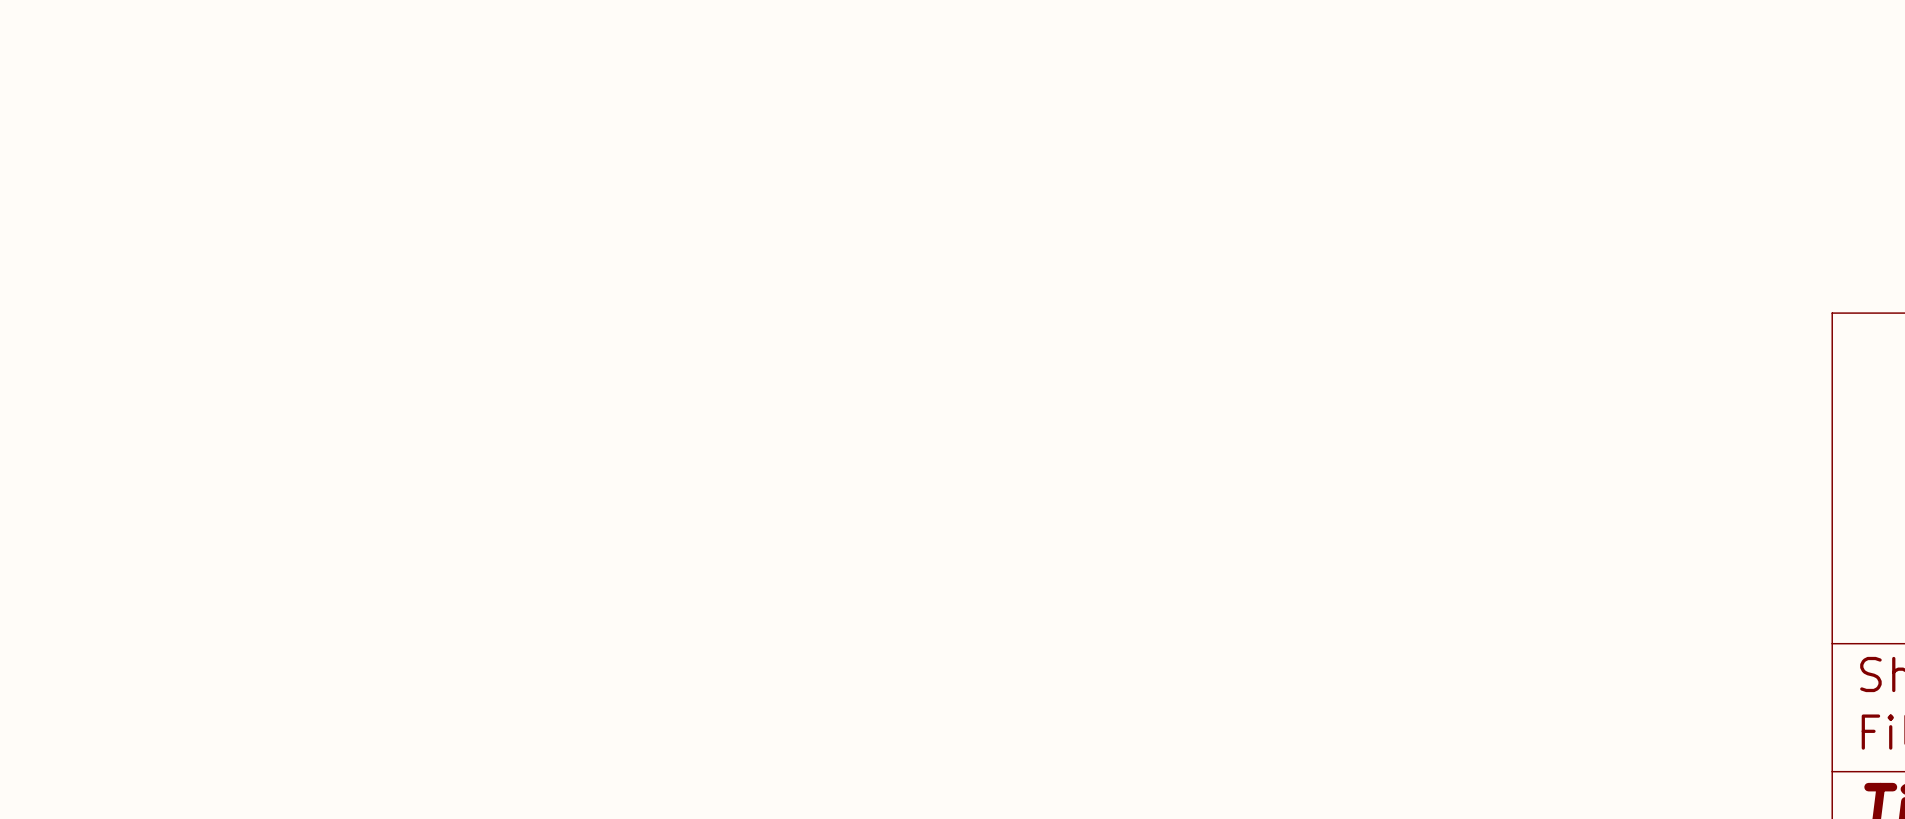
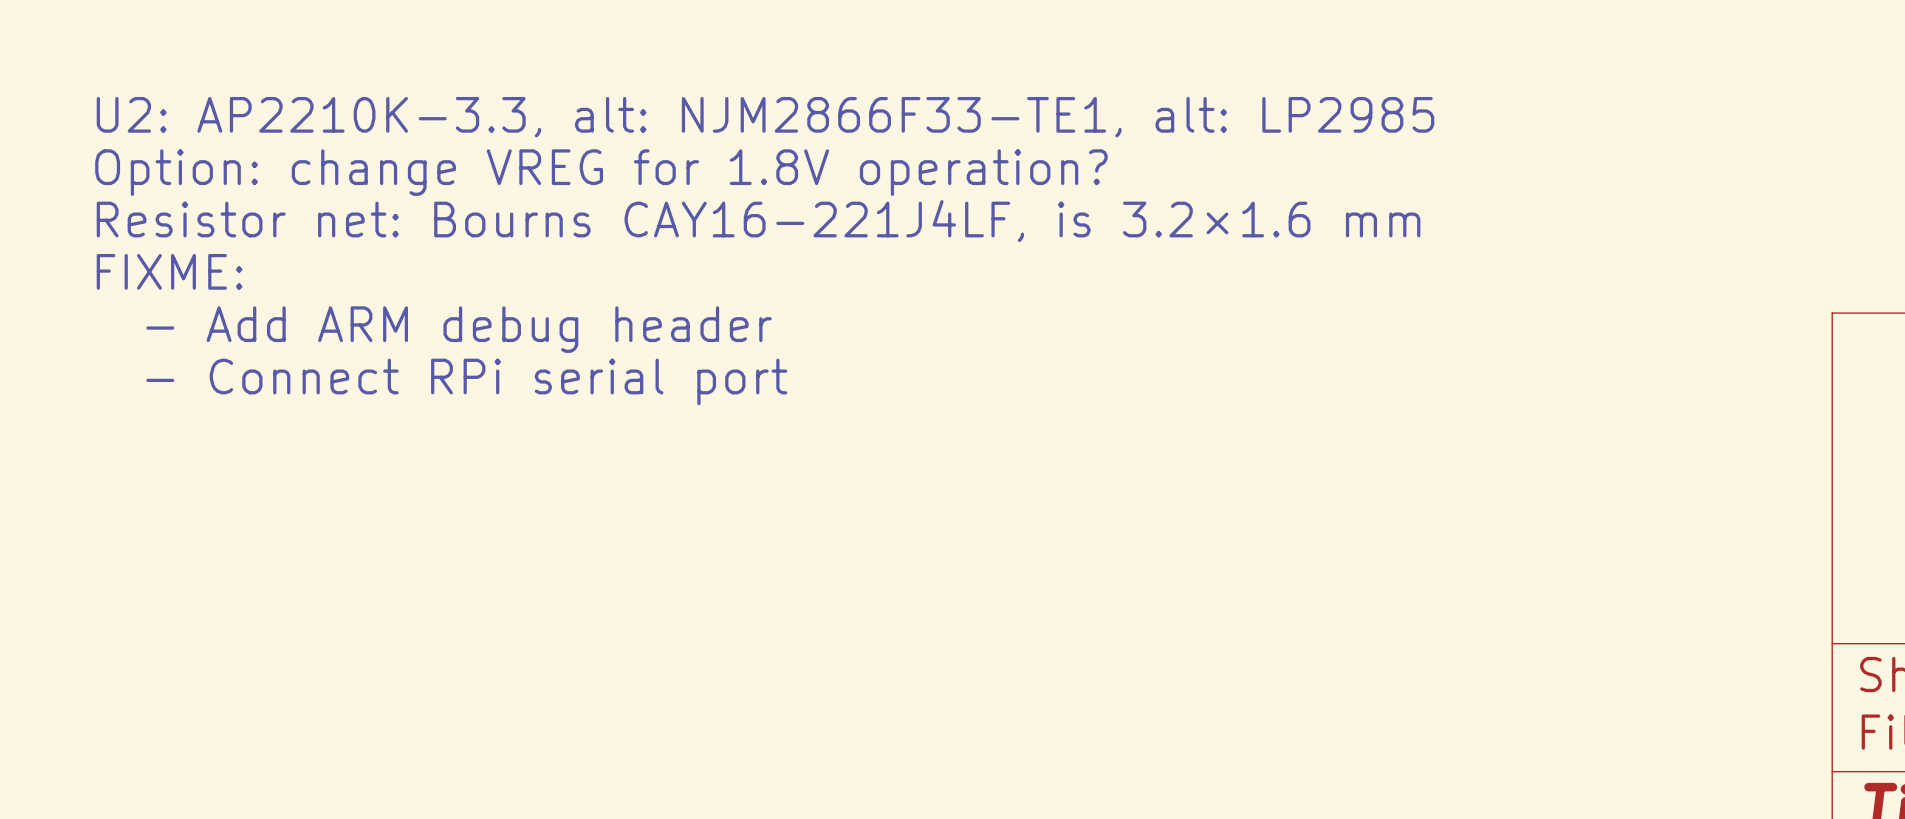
text: none -> U2: AP2210K-3.3, alt: NJM2866F33-TE1, alt: LP2985 (765, 117)
text: none -> Option: change VREG for 1.8V operation? (601, 172)
text: none -> Resistor net: Bourns CAY16-221J4LF, is 3.2×1.6 mm (758, 221)
text: none -> FIXME: (169, 271)
text: none -> - Add ARM debug header (459, 329)
text: none -> - Connect RPi serial port (466, 381)

